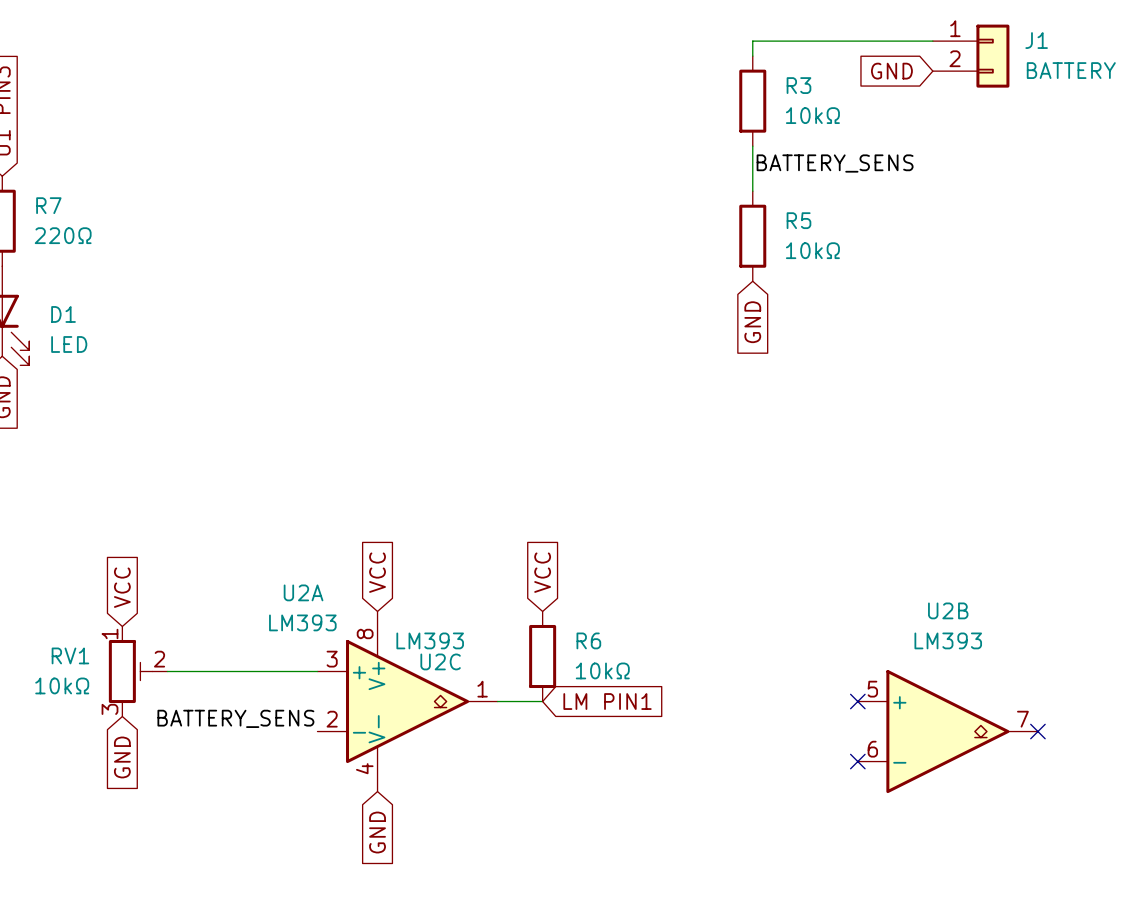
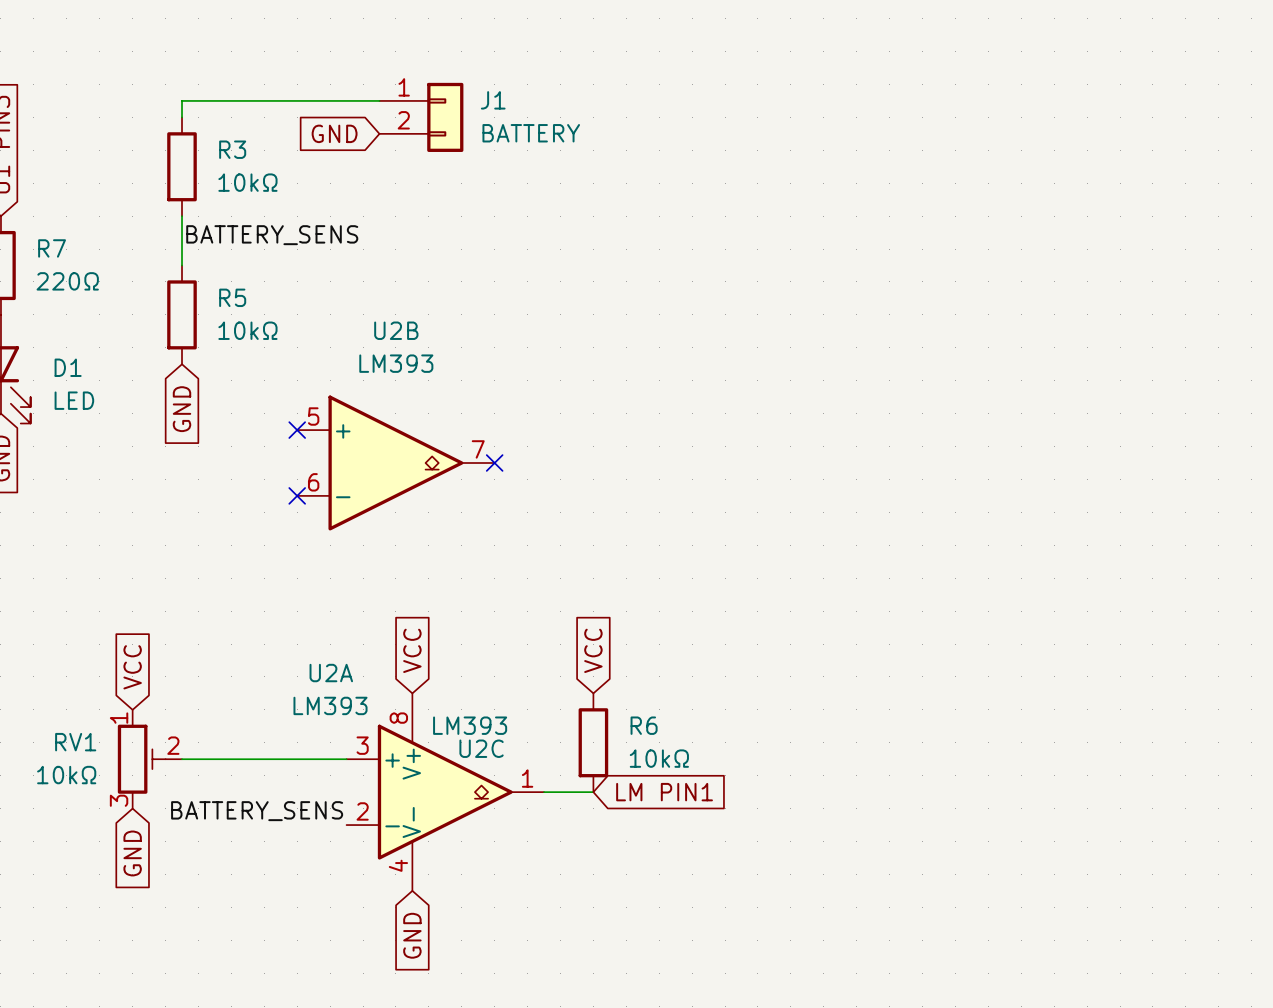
wire: (932, 41) (752, 41) (752, 56) -> none
J1 position: (971, 56) -> (421, 117)
wire: none -> (379, 100) (182, 100) (182, 117)
global label: GND (891, 71) -> none
global label: none -> GND (334, 133)
R3 position: (752, 101) -> (182, 166)
wire: (752, 146) (752, 191) -> none
label: BATTERY_SENS (835, 163) -> none
wire: none -> (182, 216) (182, 265)
label: none -> BATTERY_SENS (272, 235)
R5 position: (752, 236) -> (182, 314)
global label: GND (752, 322) -> none
global label: none -> GND (182, 409)
no-connect mark: none -> (297, 430)
no-connect mark: none -> (494, 463)
no-connect mark: none -> (297, 495)
no-connect mark: (857, 701) -> none
U2B position: (947, 731) -> (395, 463)
no-connect mark: (1037, 731) -> none
no-connect mark: (857, 761) -> none

